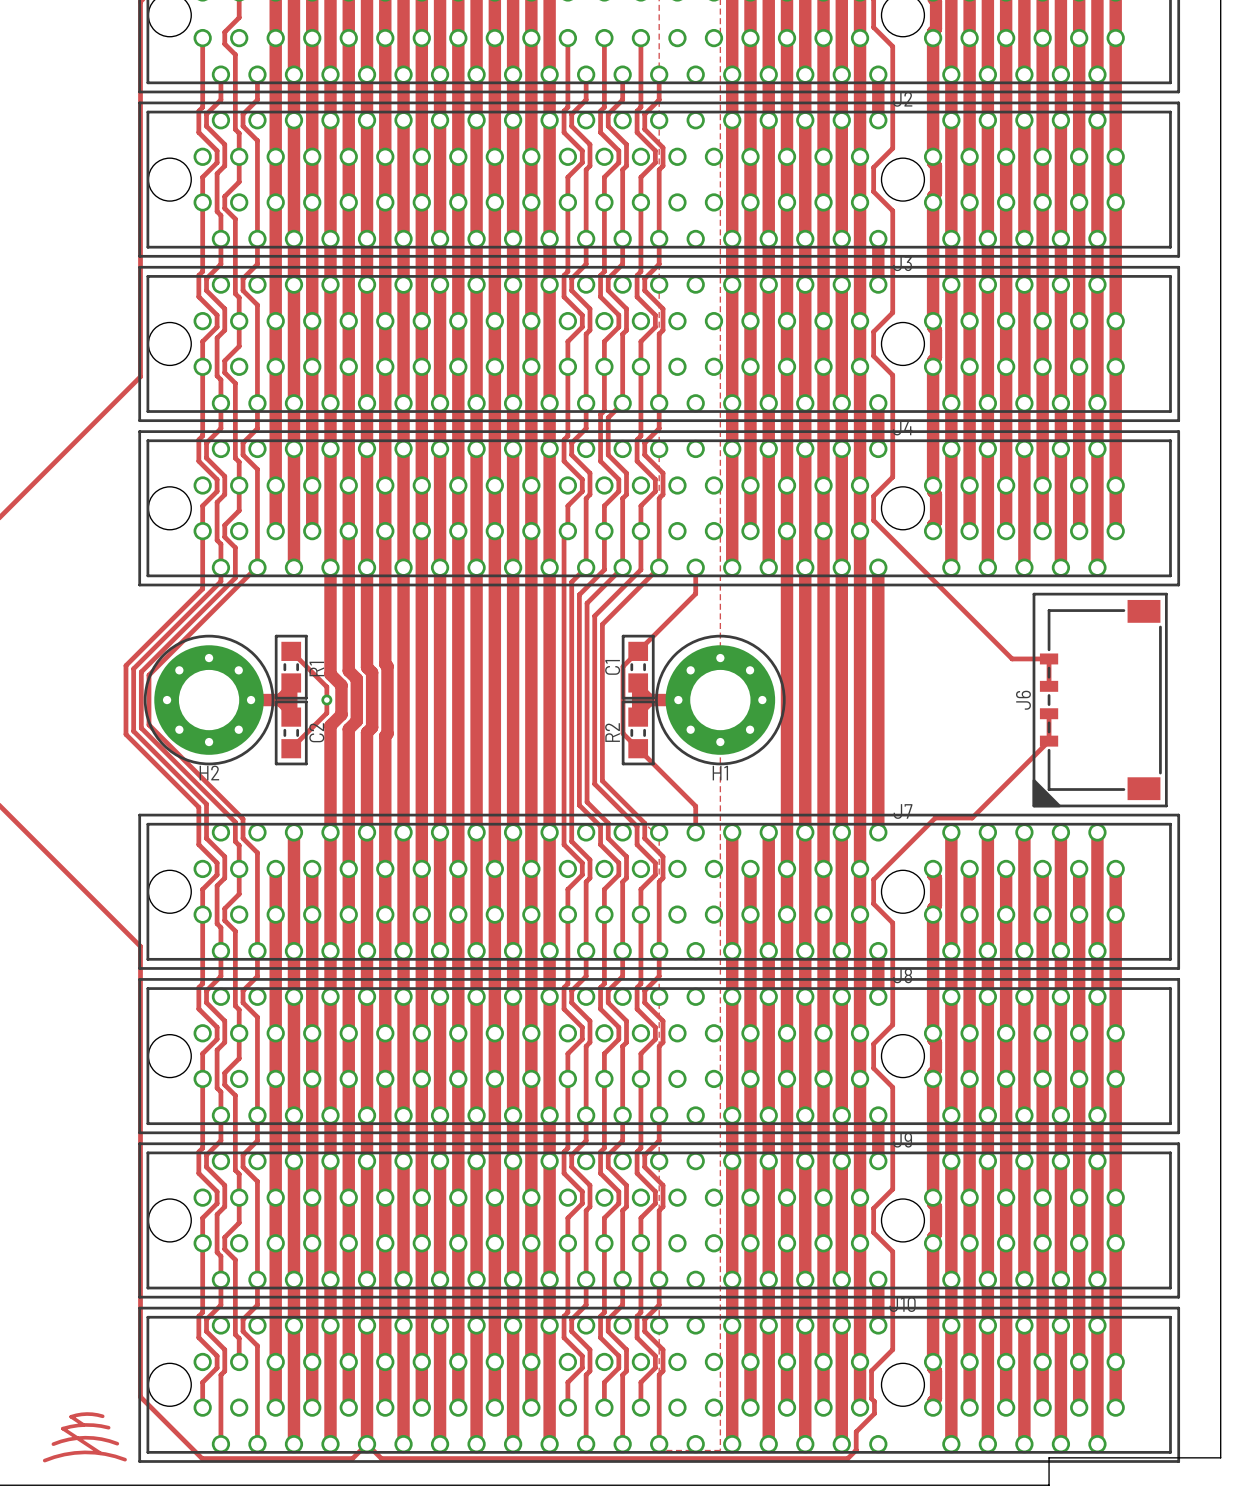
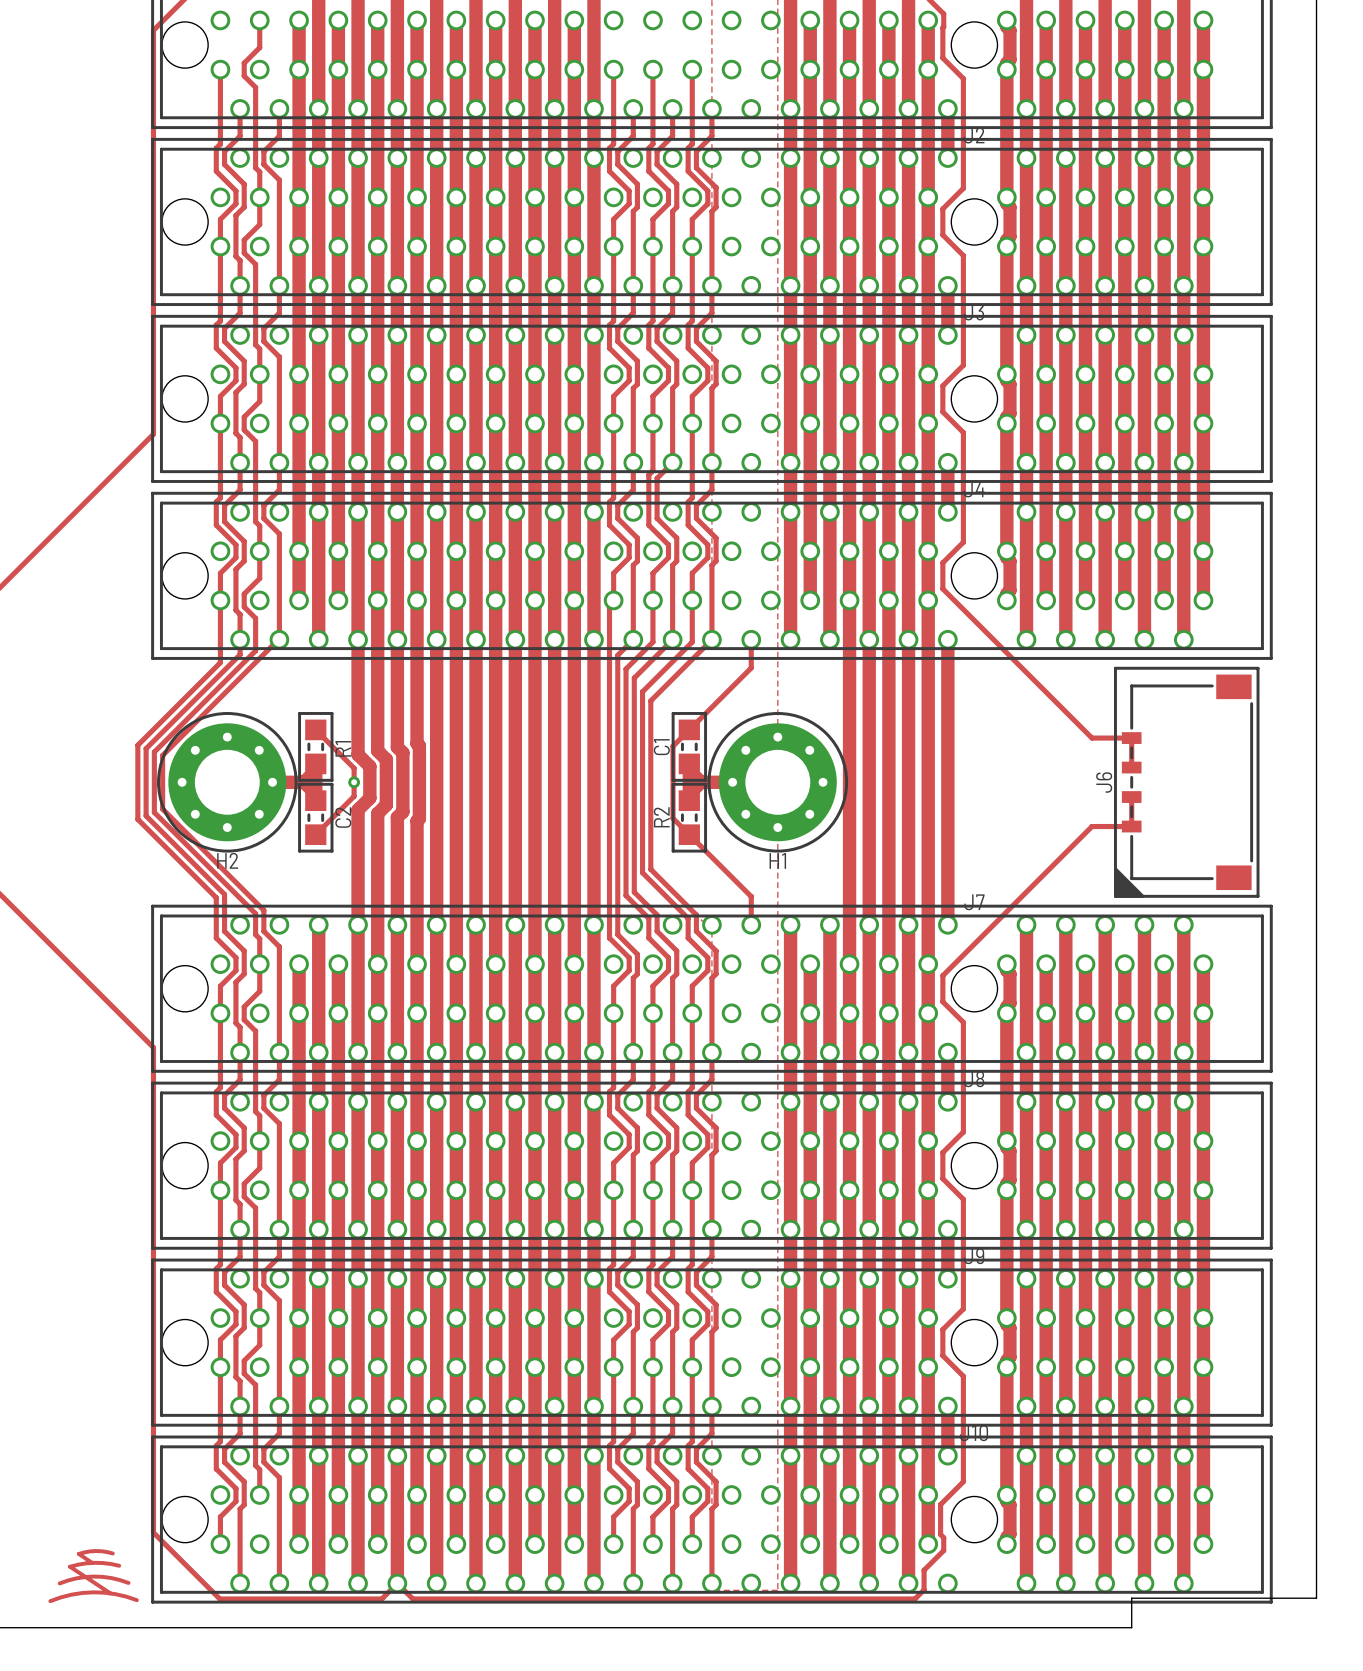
track: (1049, 741) (972, 818) (935, 818) -> (1131, 826) (1091, 826) (1009, 909)

